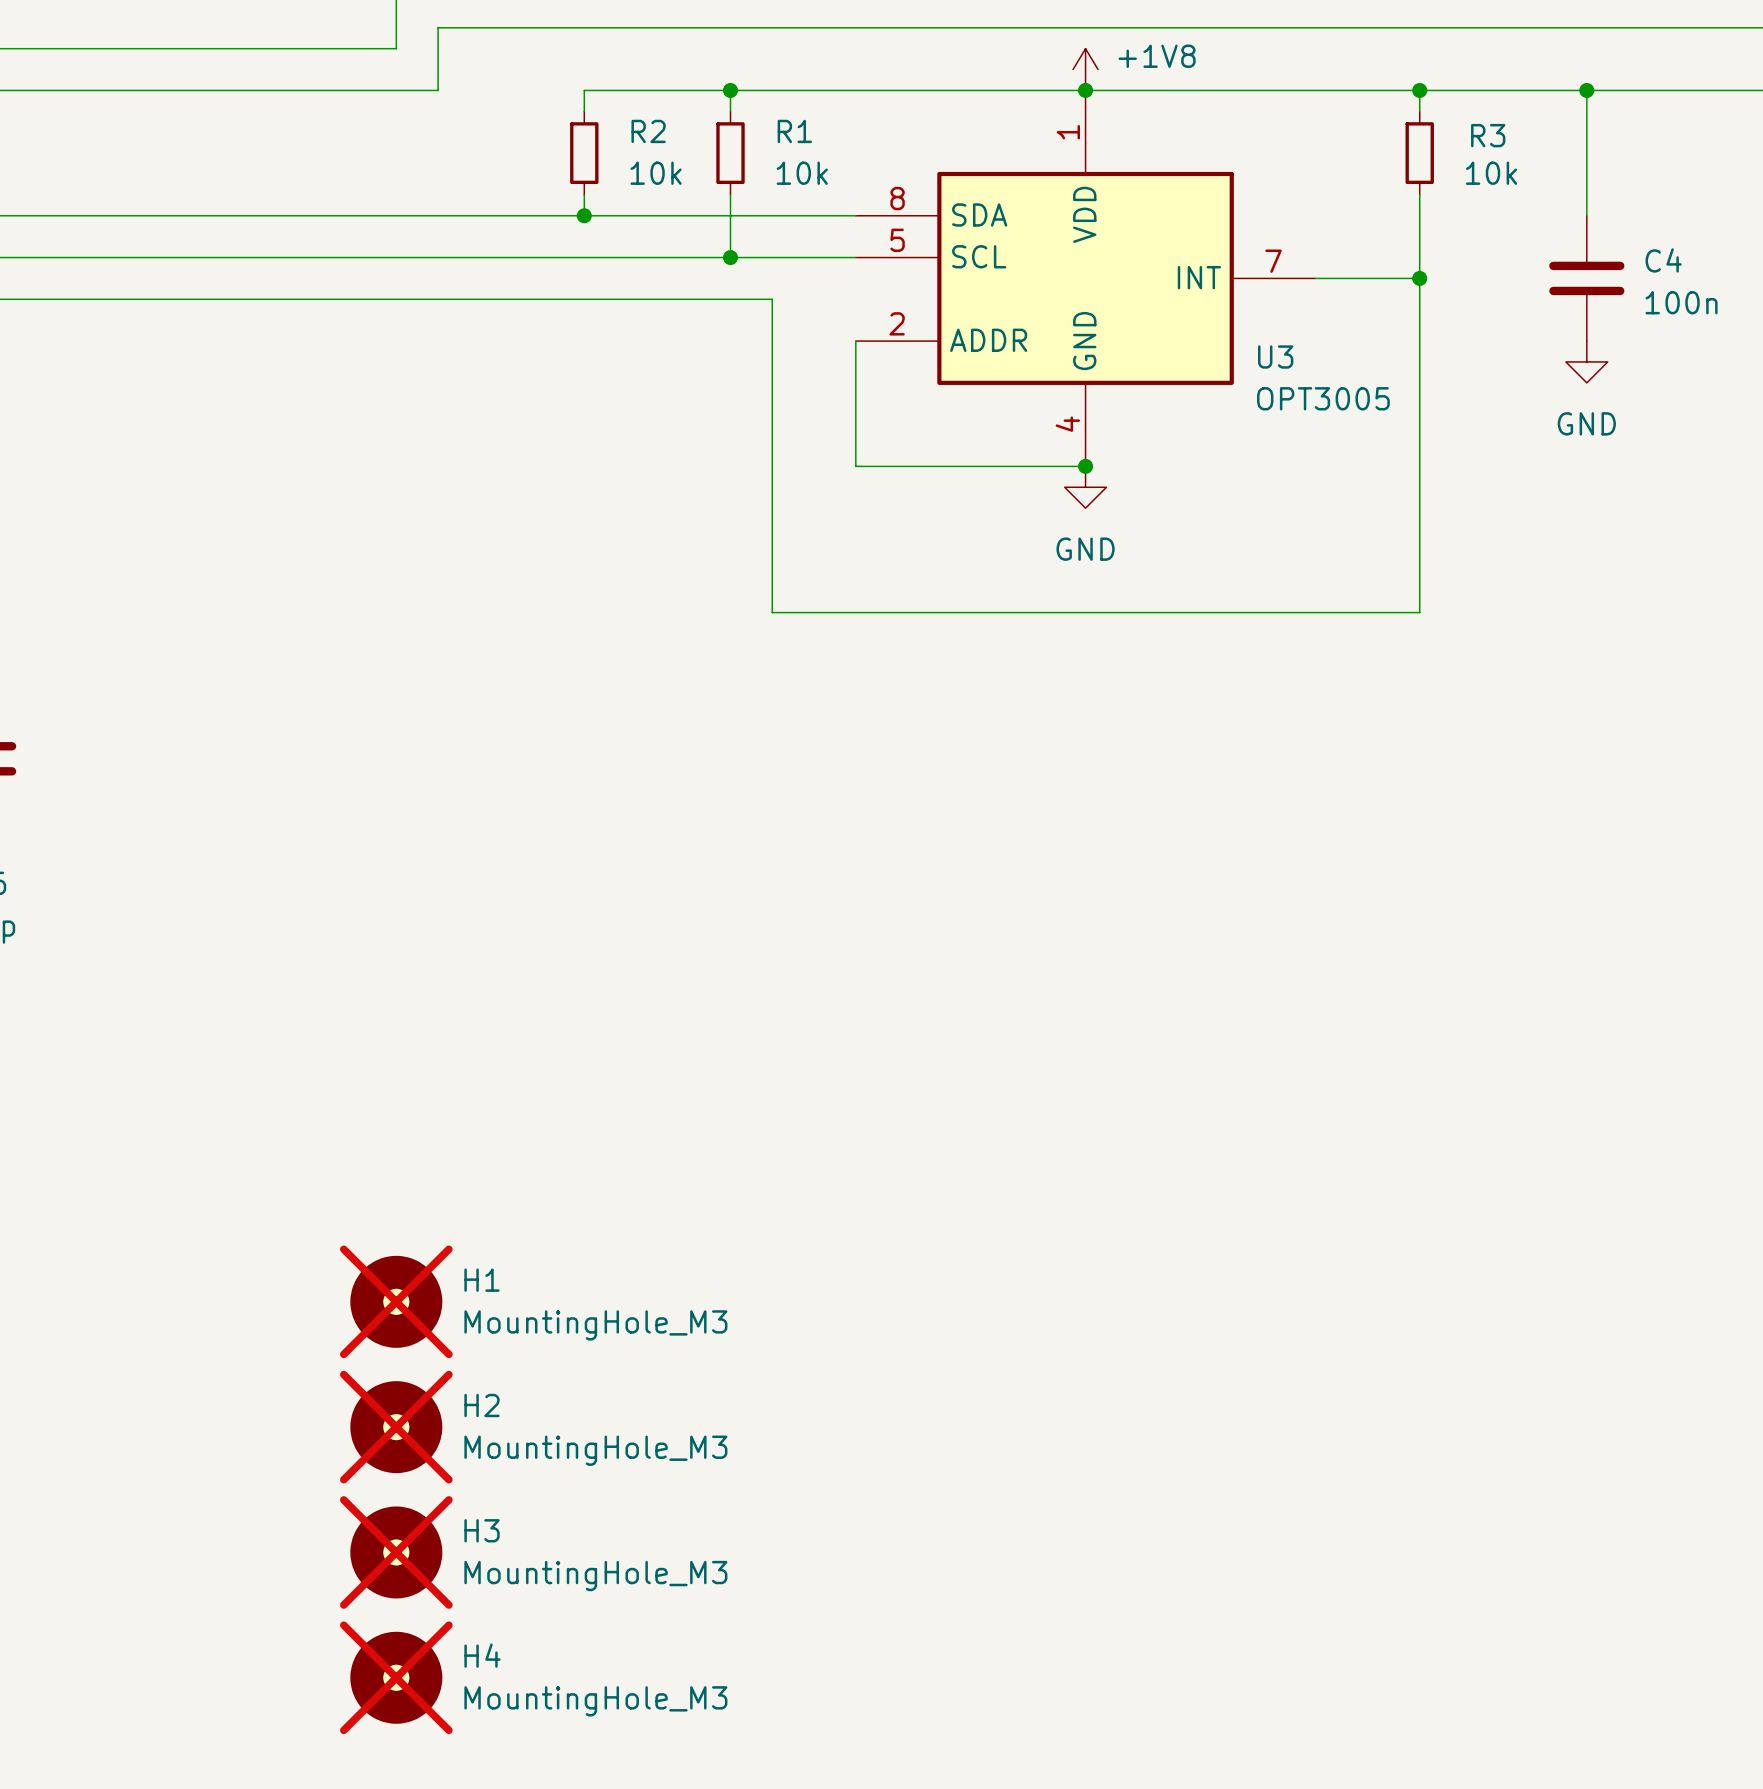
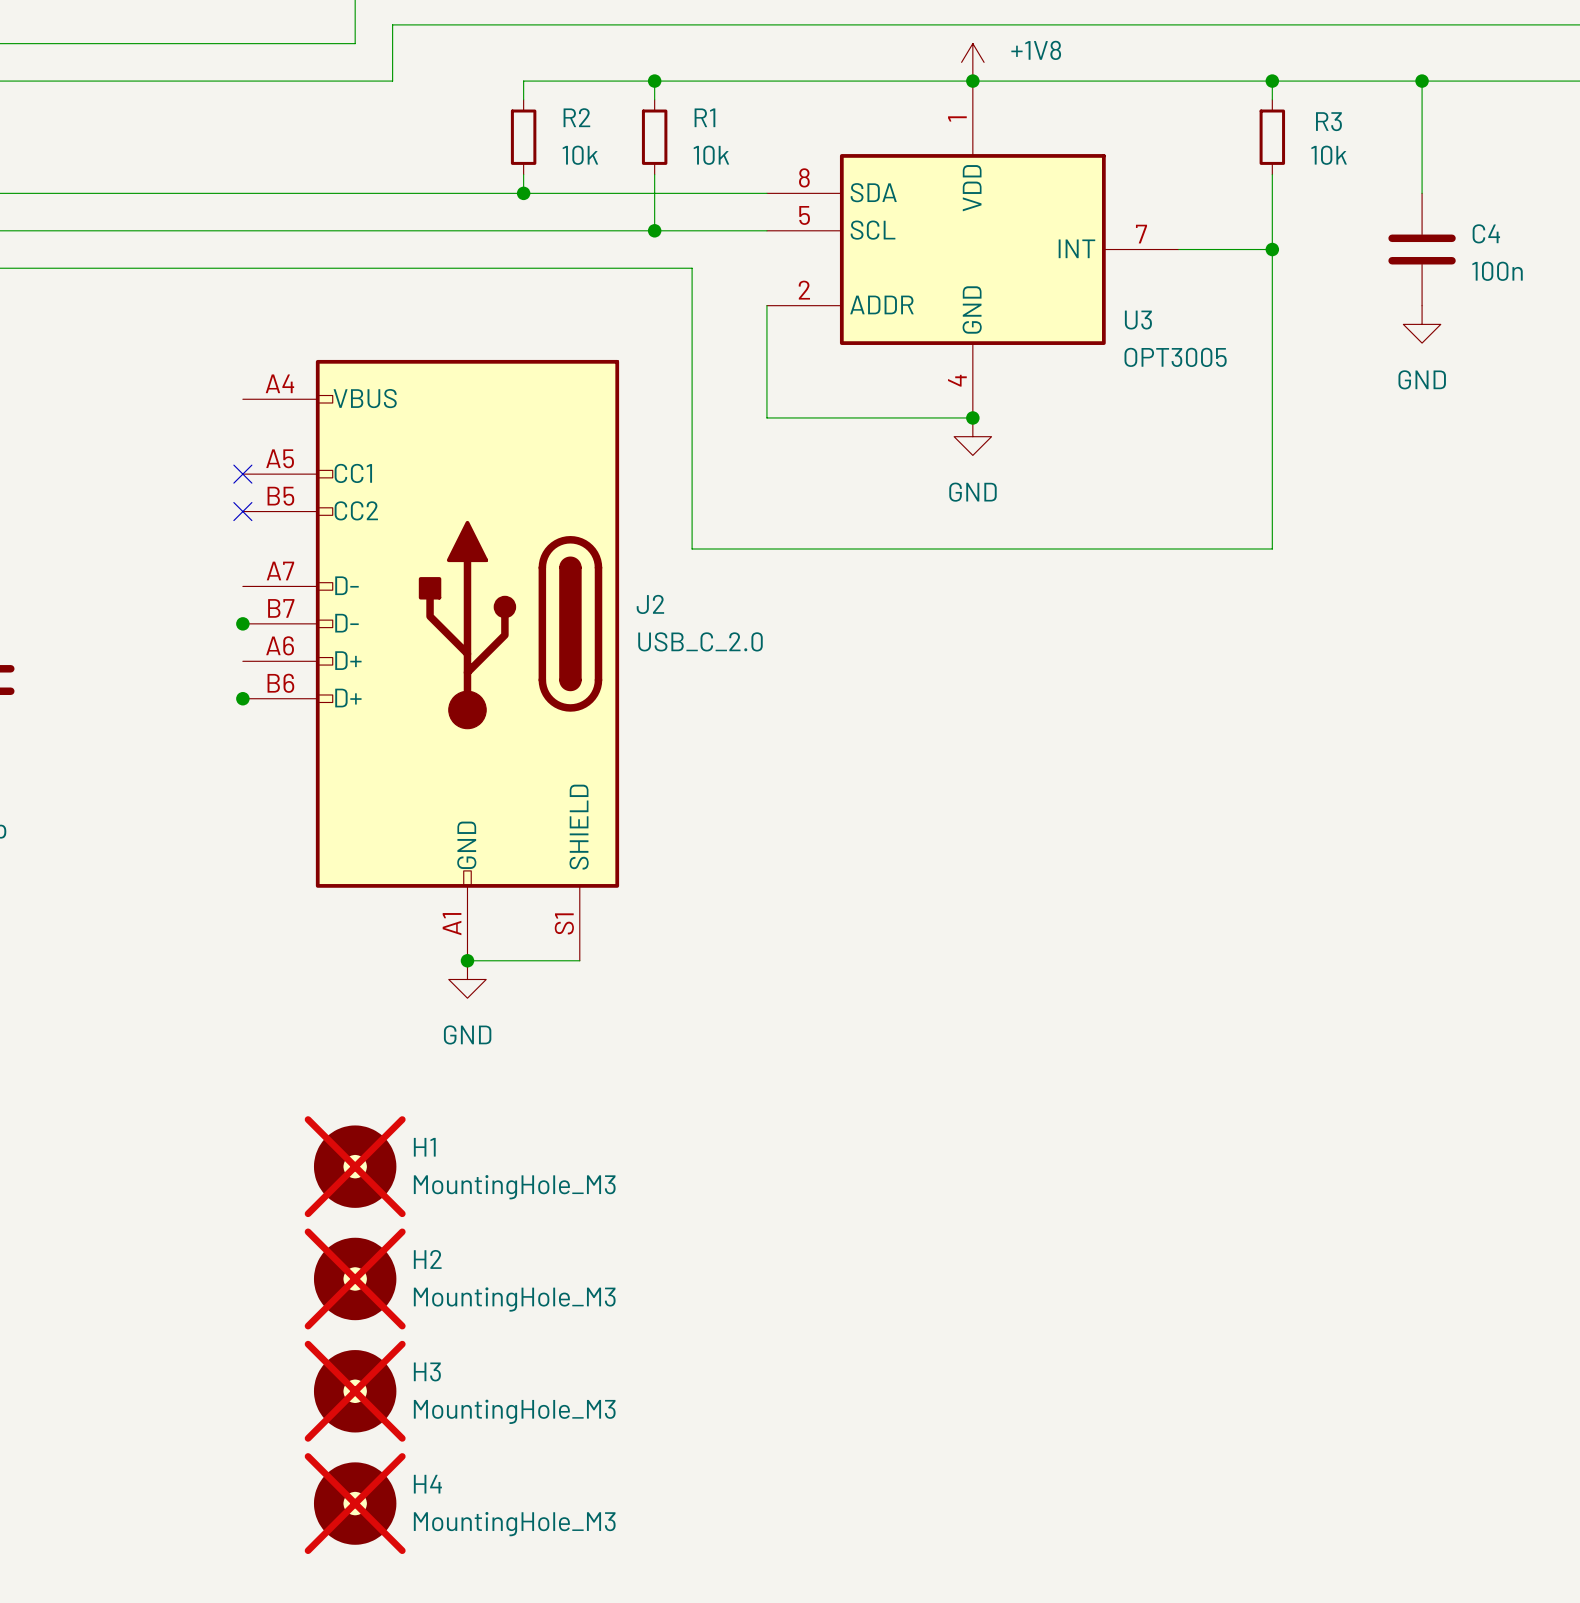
no-connect mark: none -> (242, 474)
no-connect mark: none -> (242, 511)
junction: none -> (242, 623)
J2: none -> USB_C_2.0 (430, 660)
junction: none -> (242, 698)
wire: none -> (467, 960) (579, 960)
junction: none -> (467, 960)
power symbol: none -> GND (467, 979)

